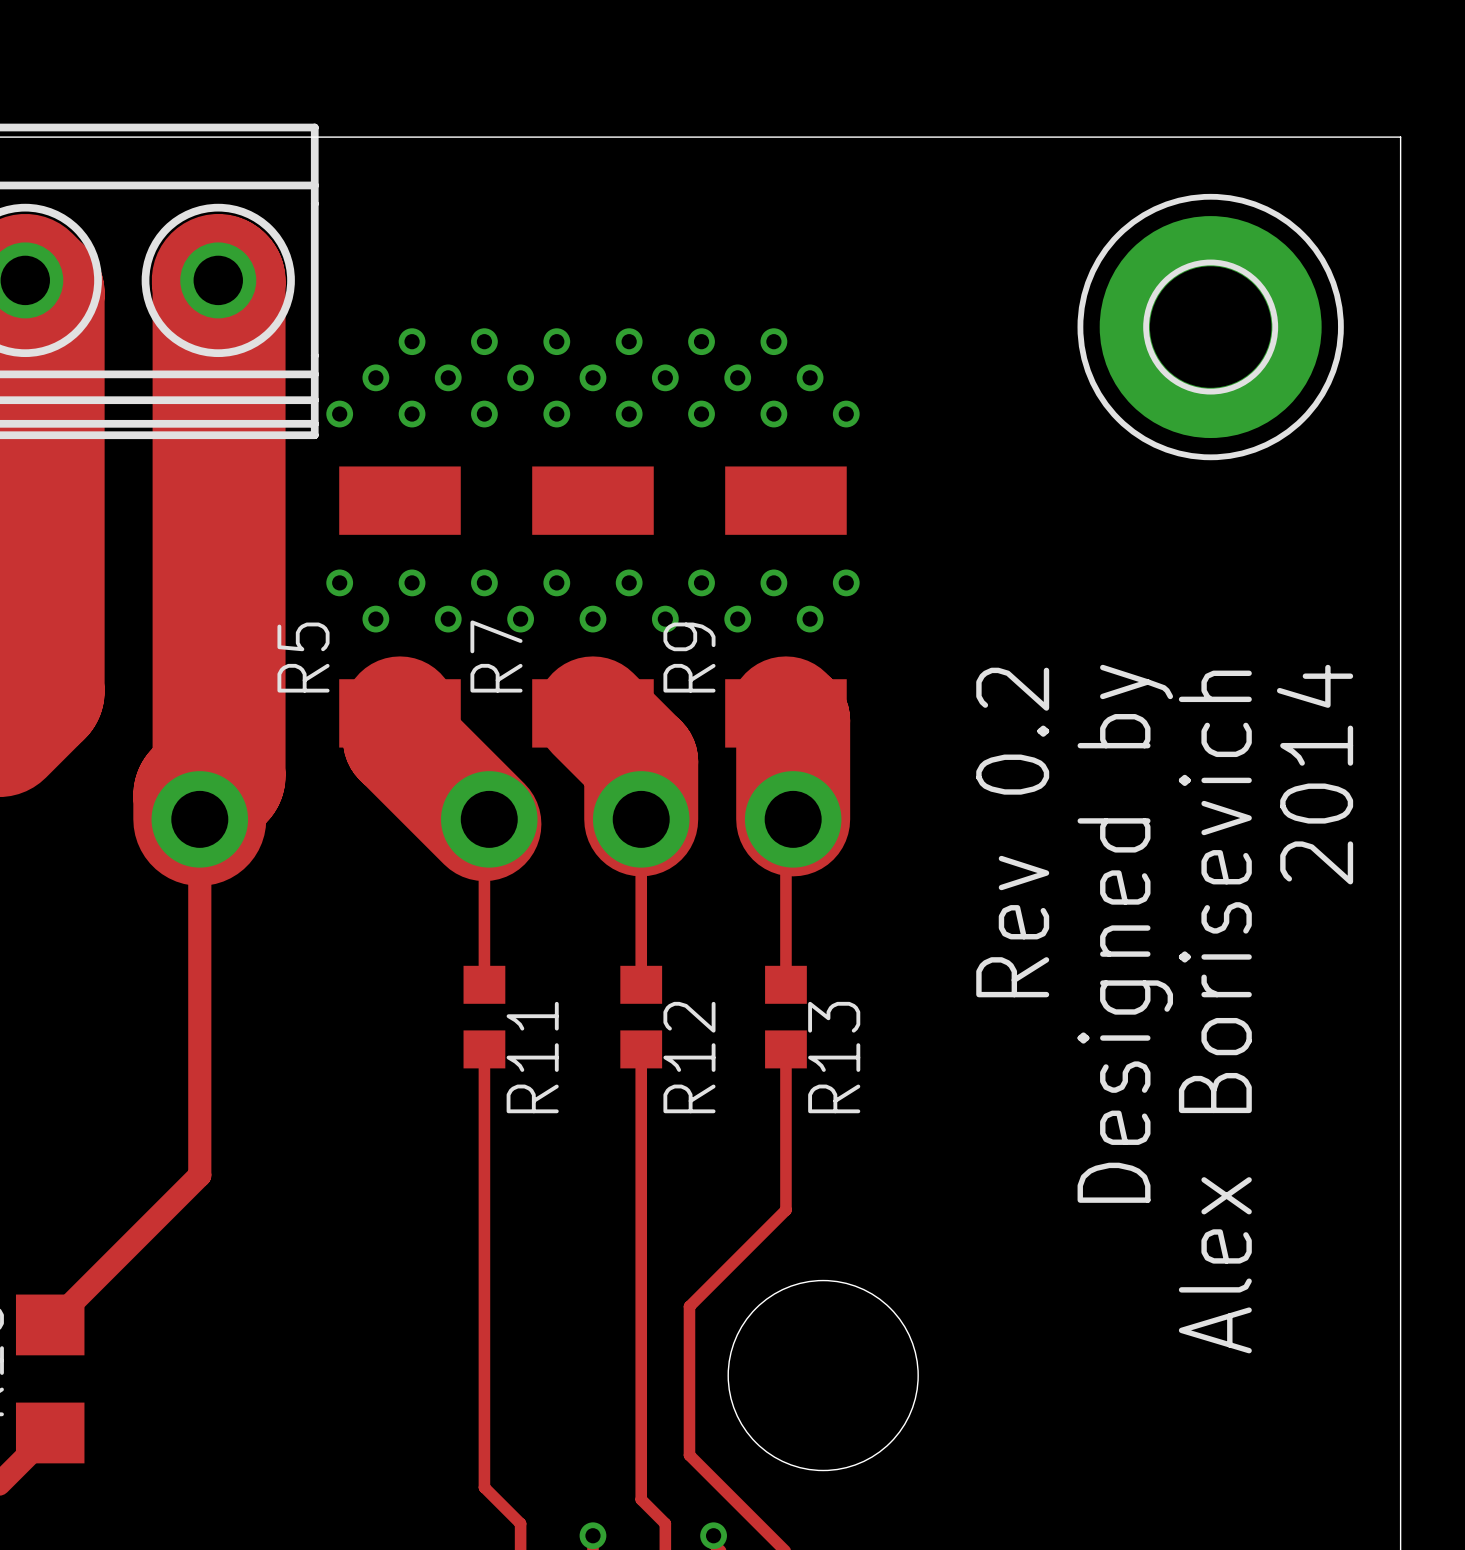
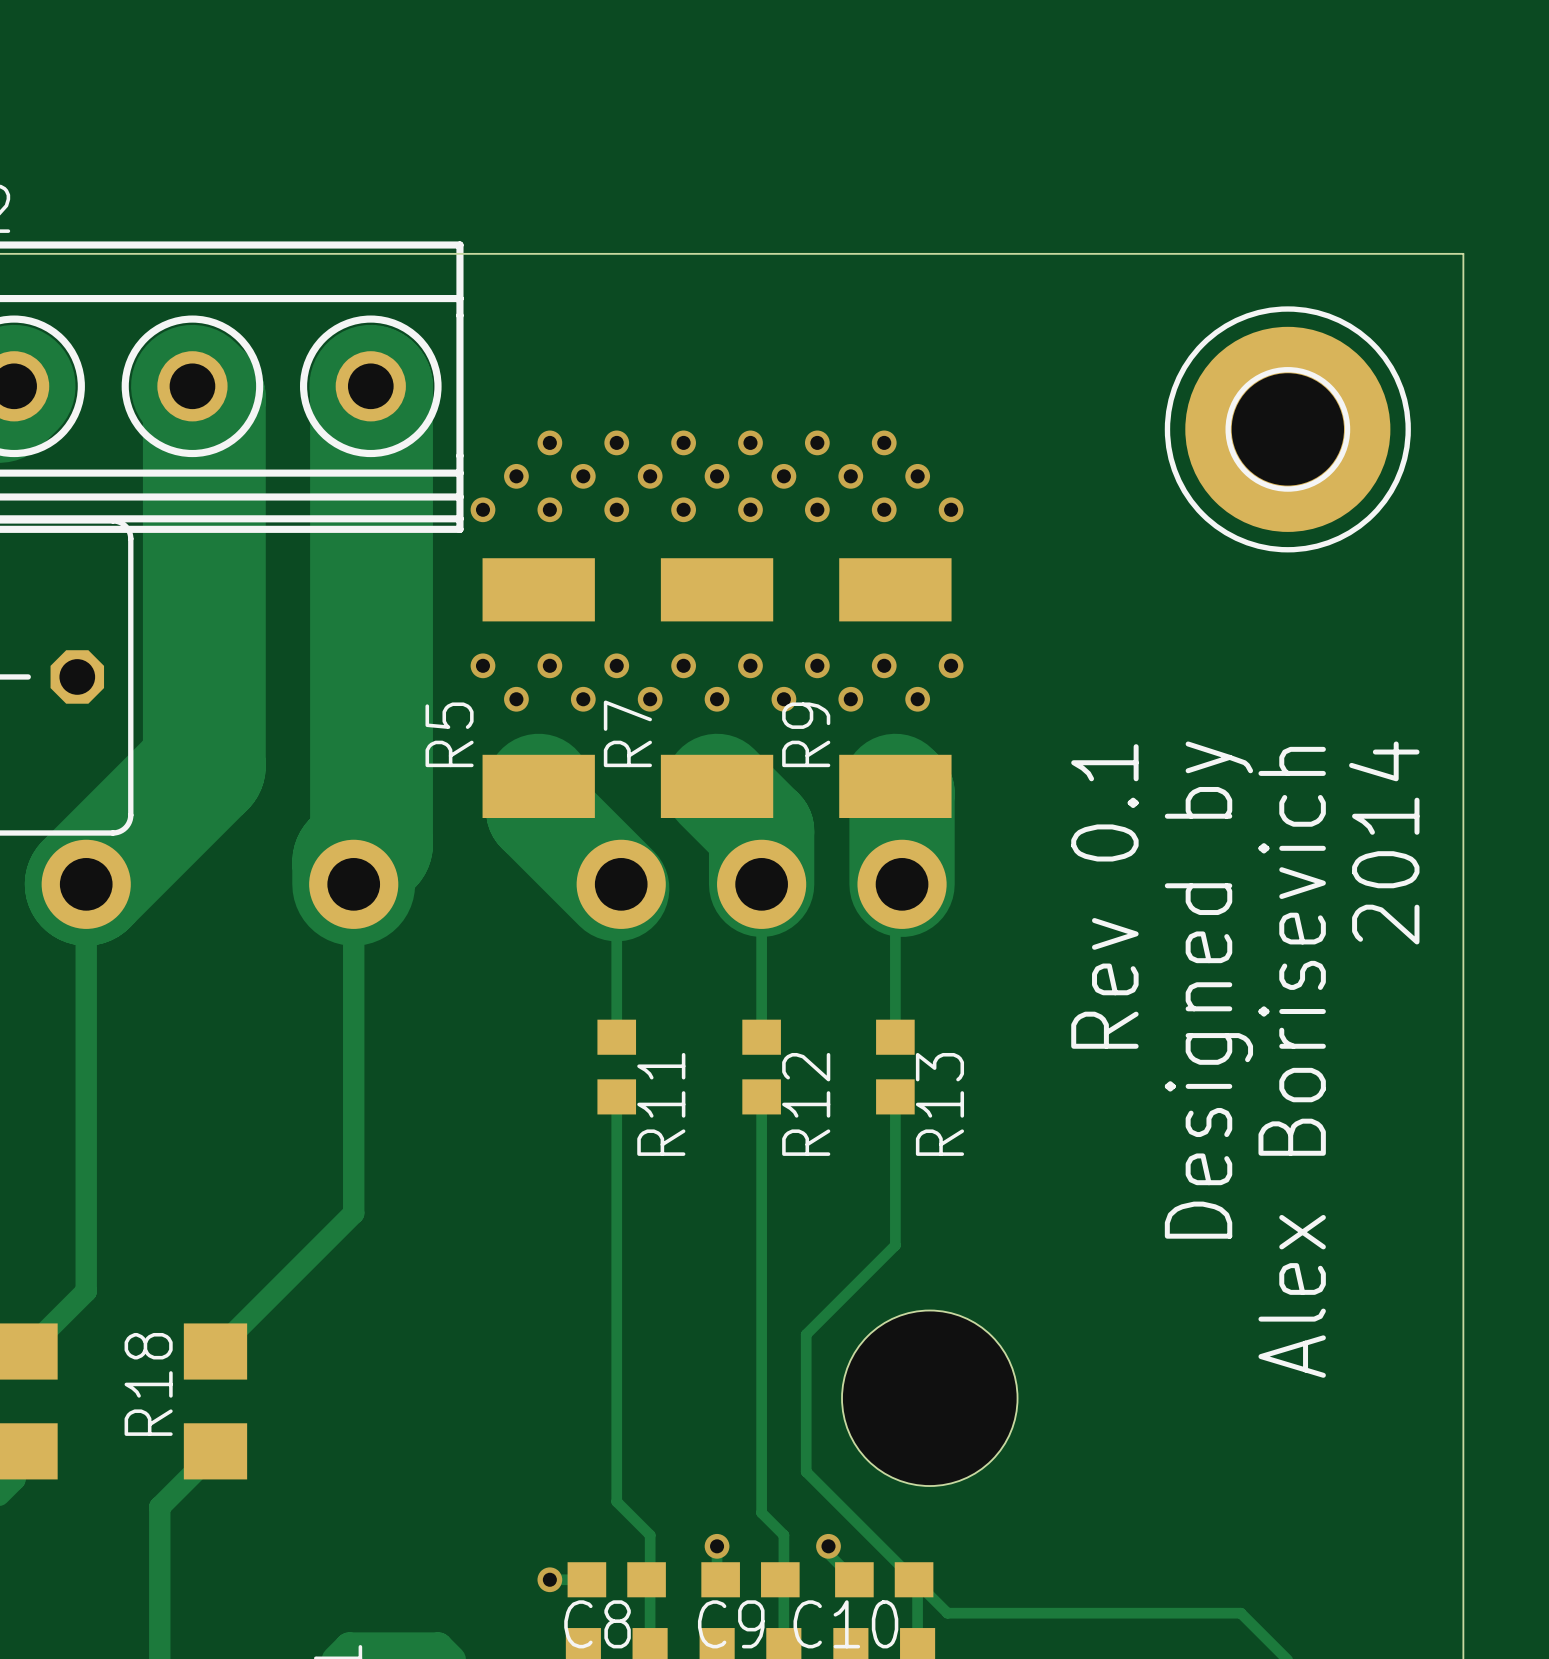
text: Rev 0.2 (1012, 832) -> Rev 0.1 (1104, 896)

